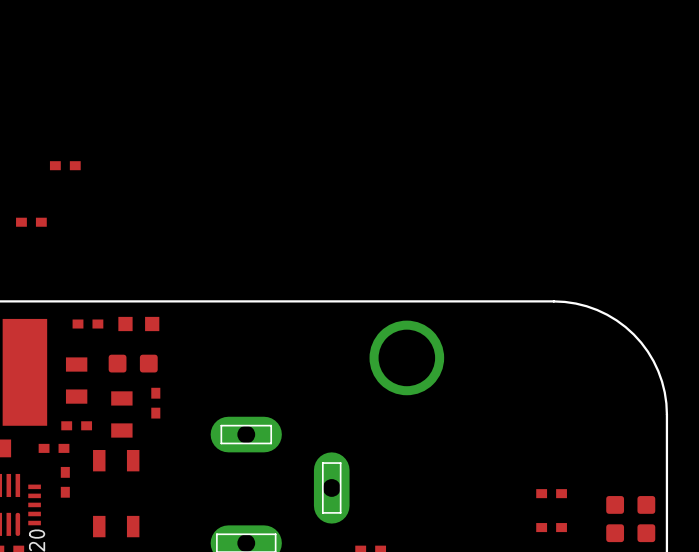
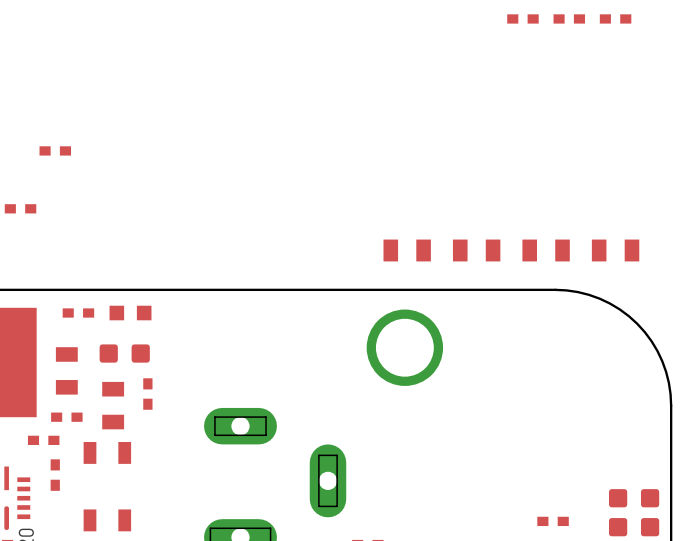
part: none -> (522, 18)
part: none -> (569, 18)
part: none -> (615, 18)
part: none -> (407, 250)
part: none -> (476, 250)
part: none -> (546, 250)
part: none -> (615, 250)
part: (551, 493) -> none

